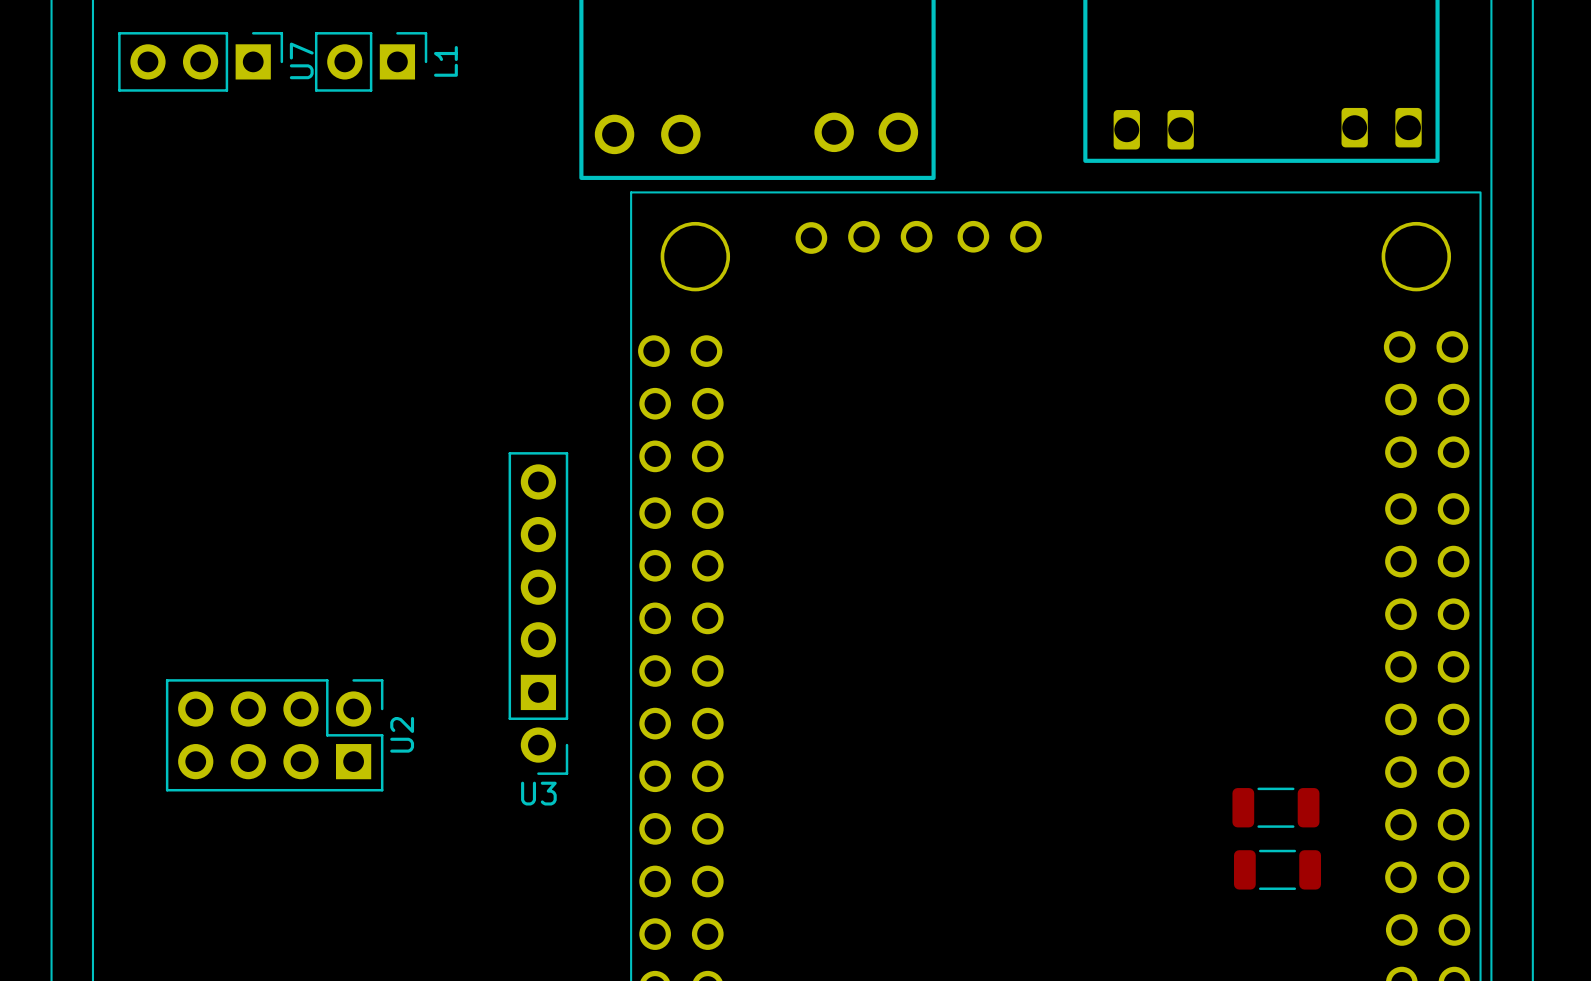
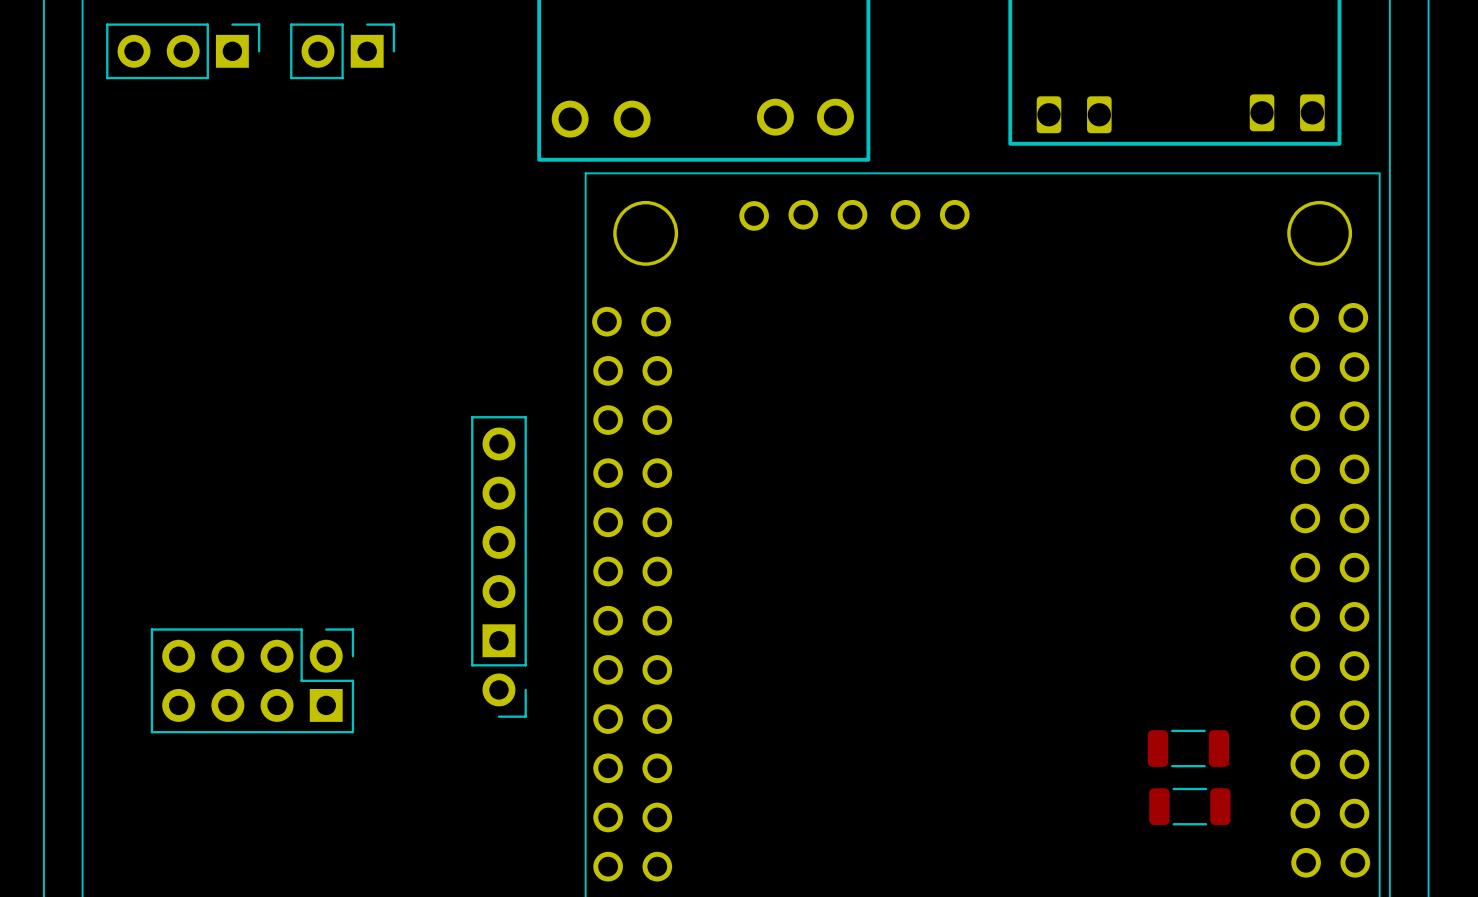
U7 name: U7 (301, 60) -> none
L1 name: L1 (445, 61) -> none
U2 name: U2 (402, 734) -> none
U3 name: U3 (538, 793) -> none

